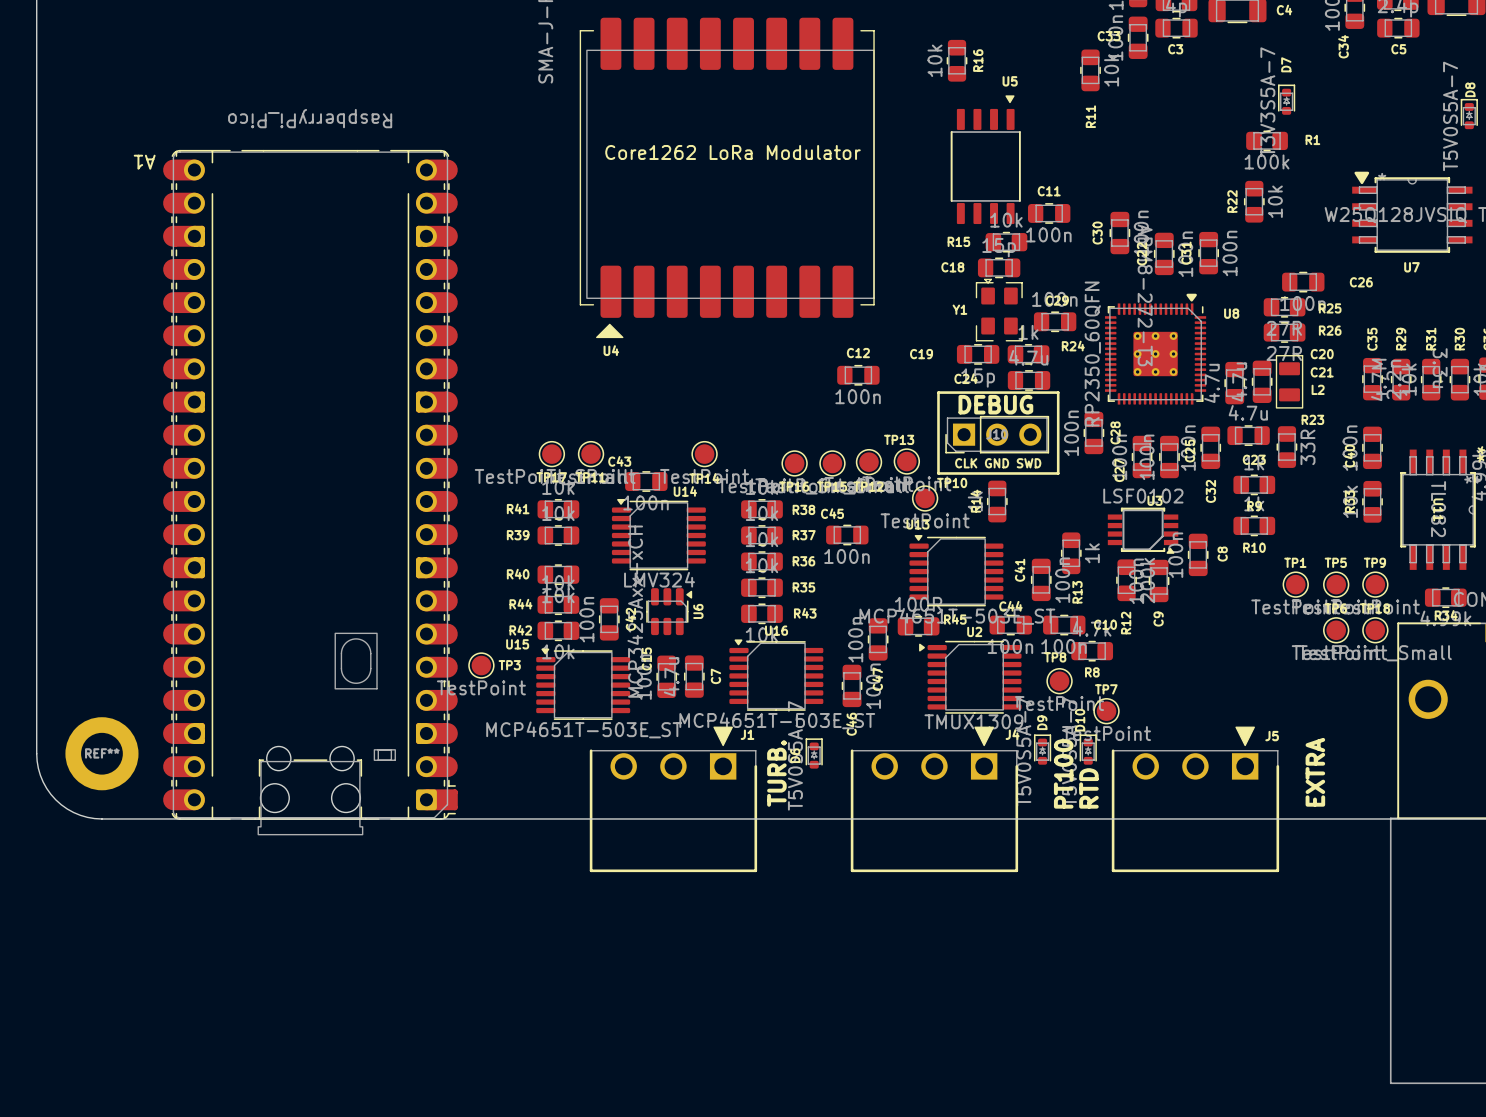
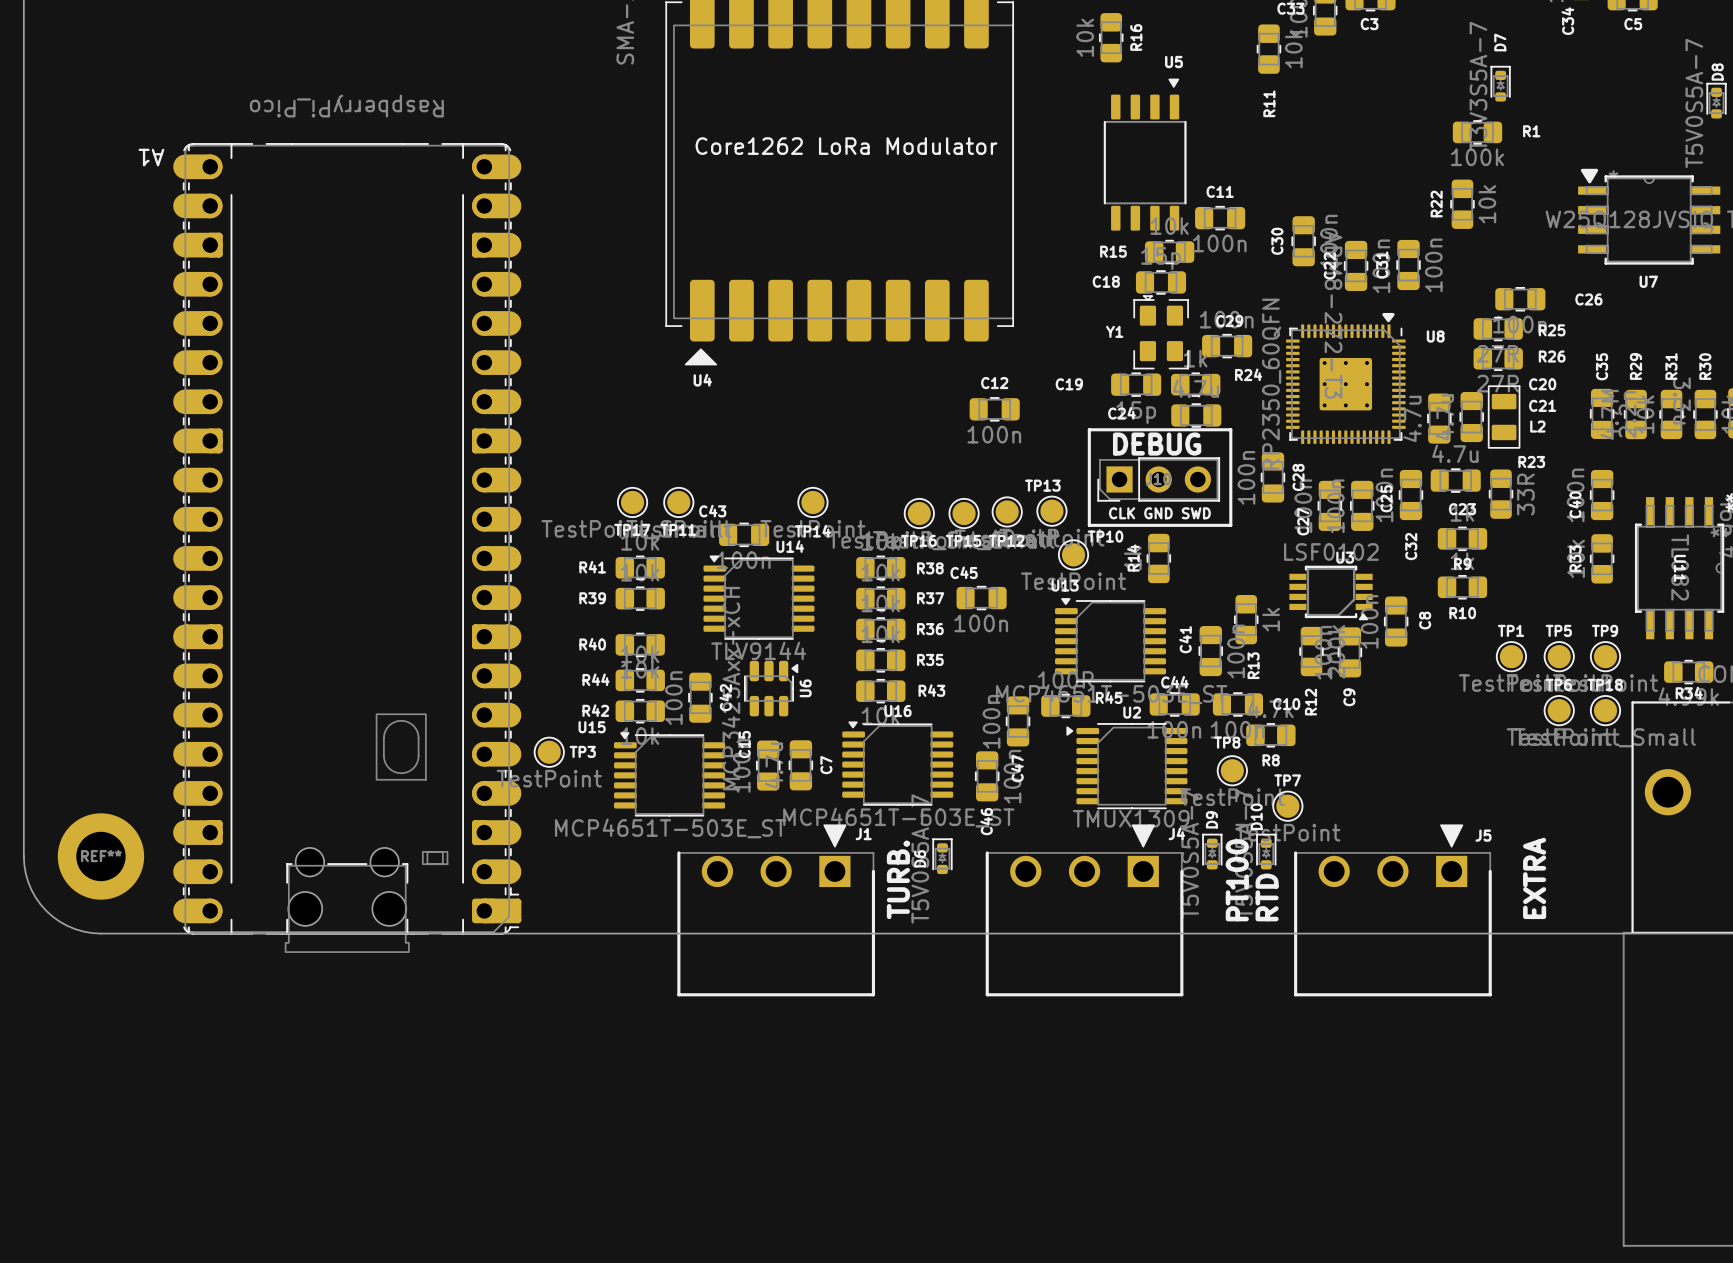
U14 value: LMV324 (659, 579) -> TLV9144 (758, 650)

